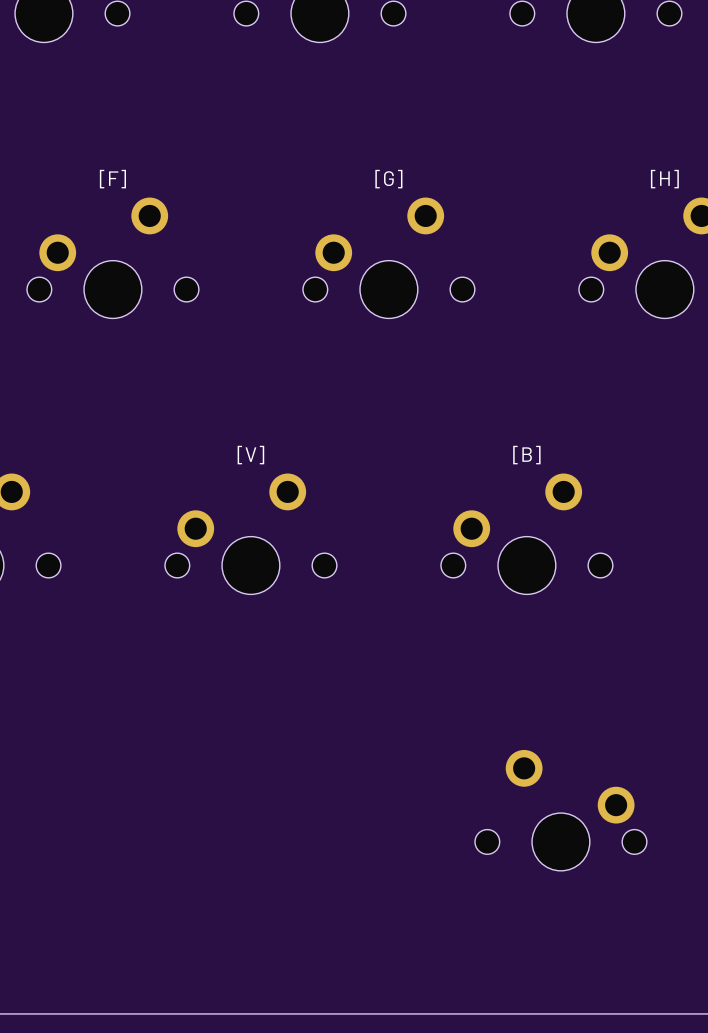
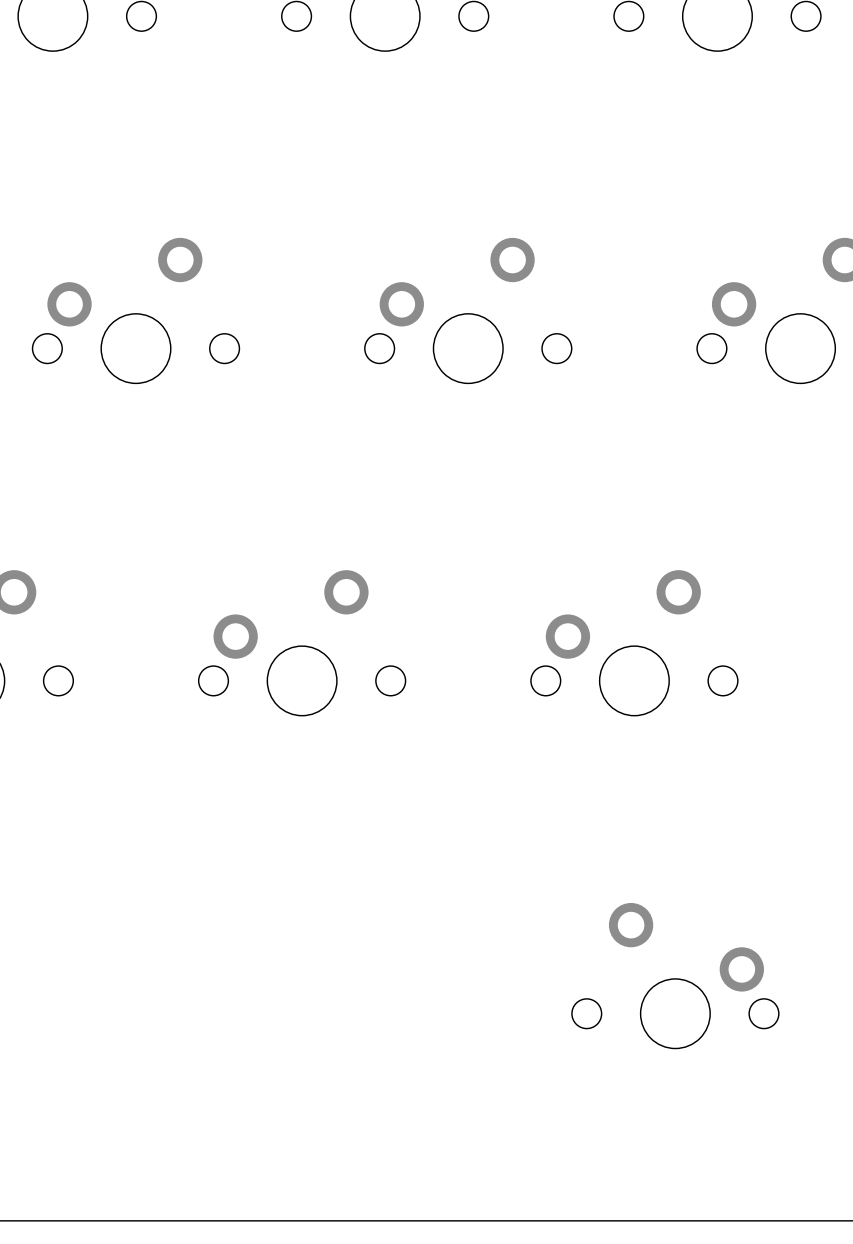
part value: [F] (112, 179) -> none
part value: [G] (388, 179) -> none
part value: [H] (664, 179) -> none
part value: [V] (250, 455) -> none
part value: [B] (526, 455) -> none

